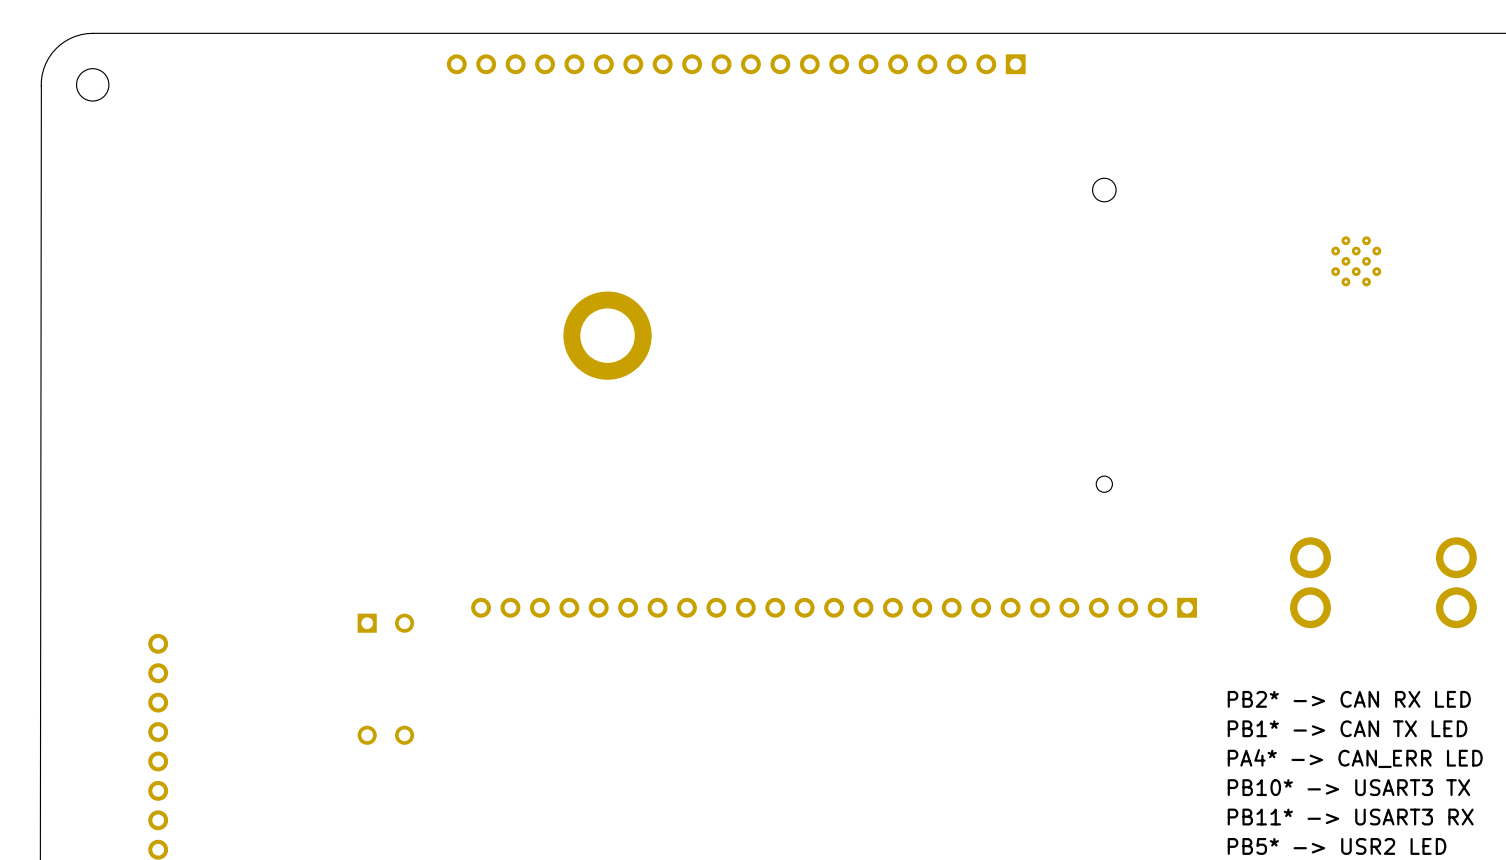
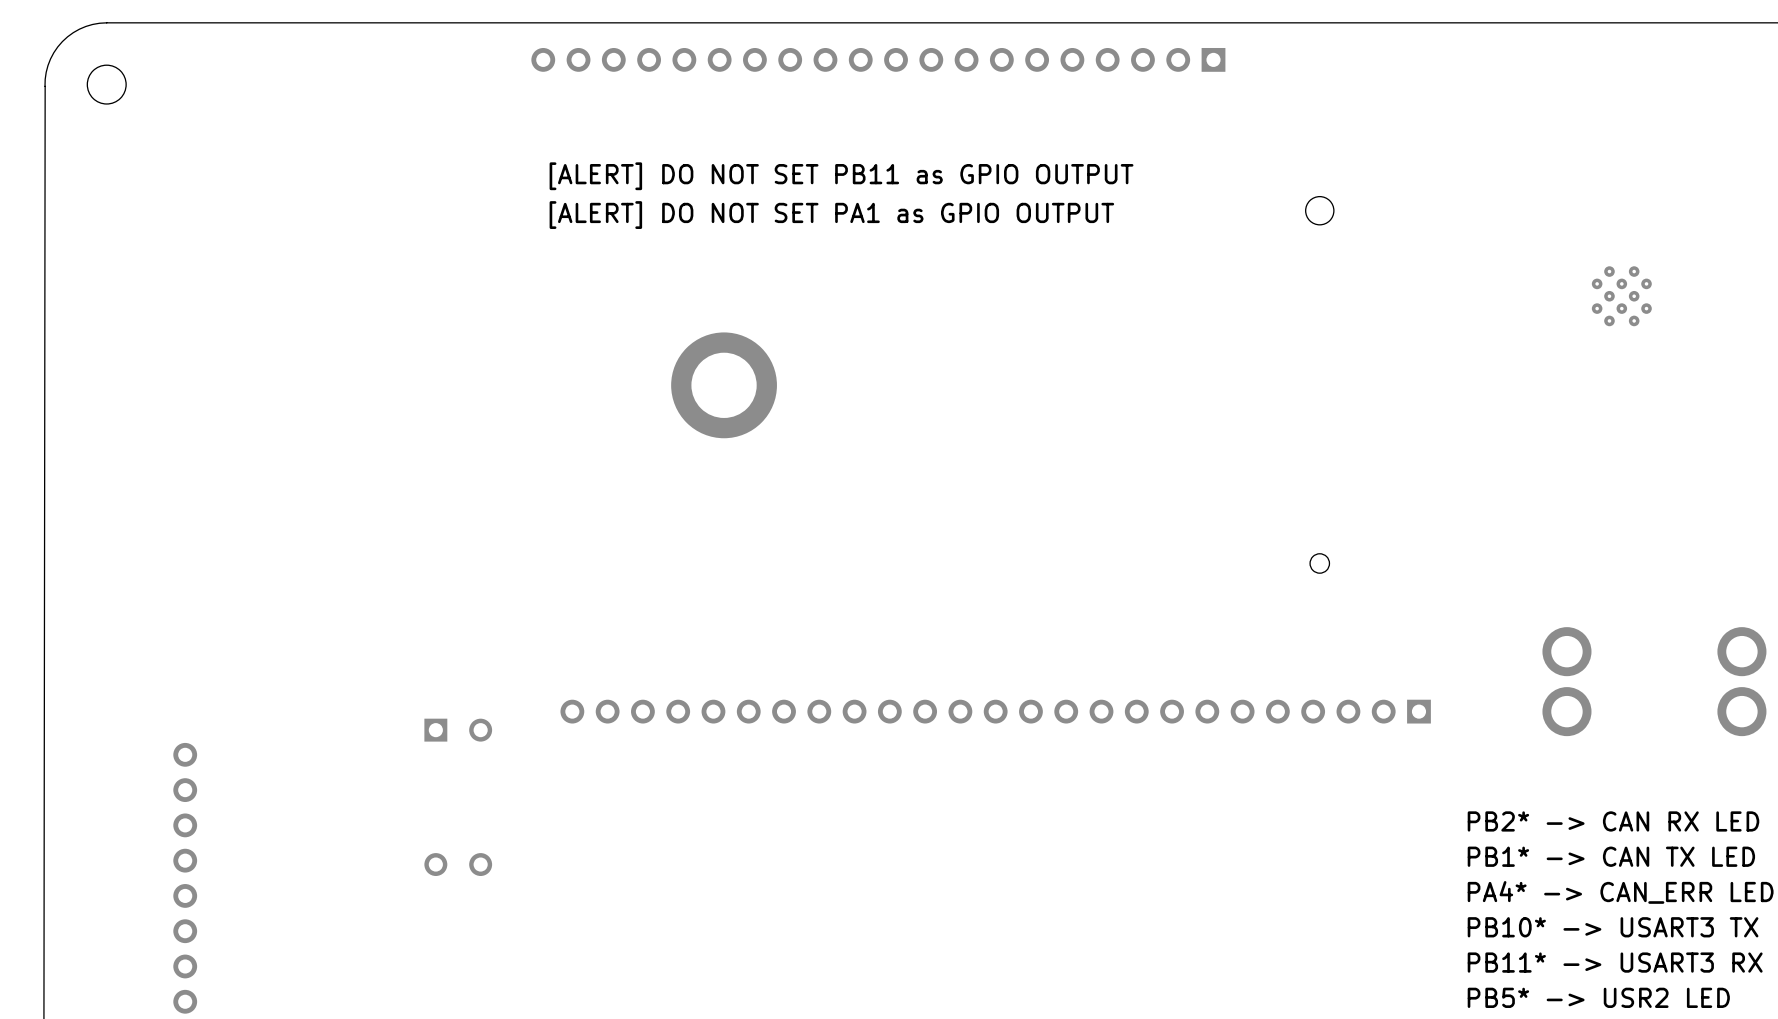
text: none -> [ALERT] DO NOT SET PB11 as GPIO OUTPUT (841, 176)
text: none -> [ALERT] DO NOT SET PA1 as GPIO OUTPUT (831, 215)

